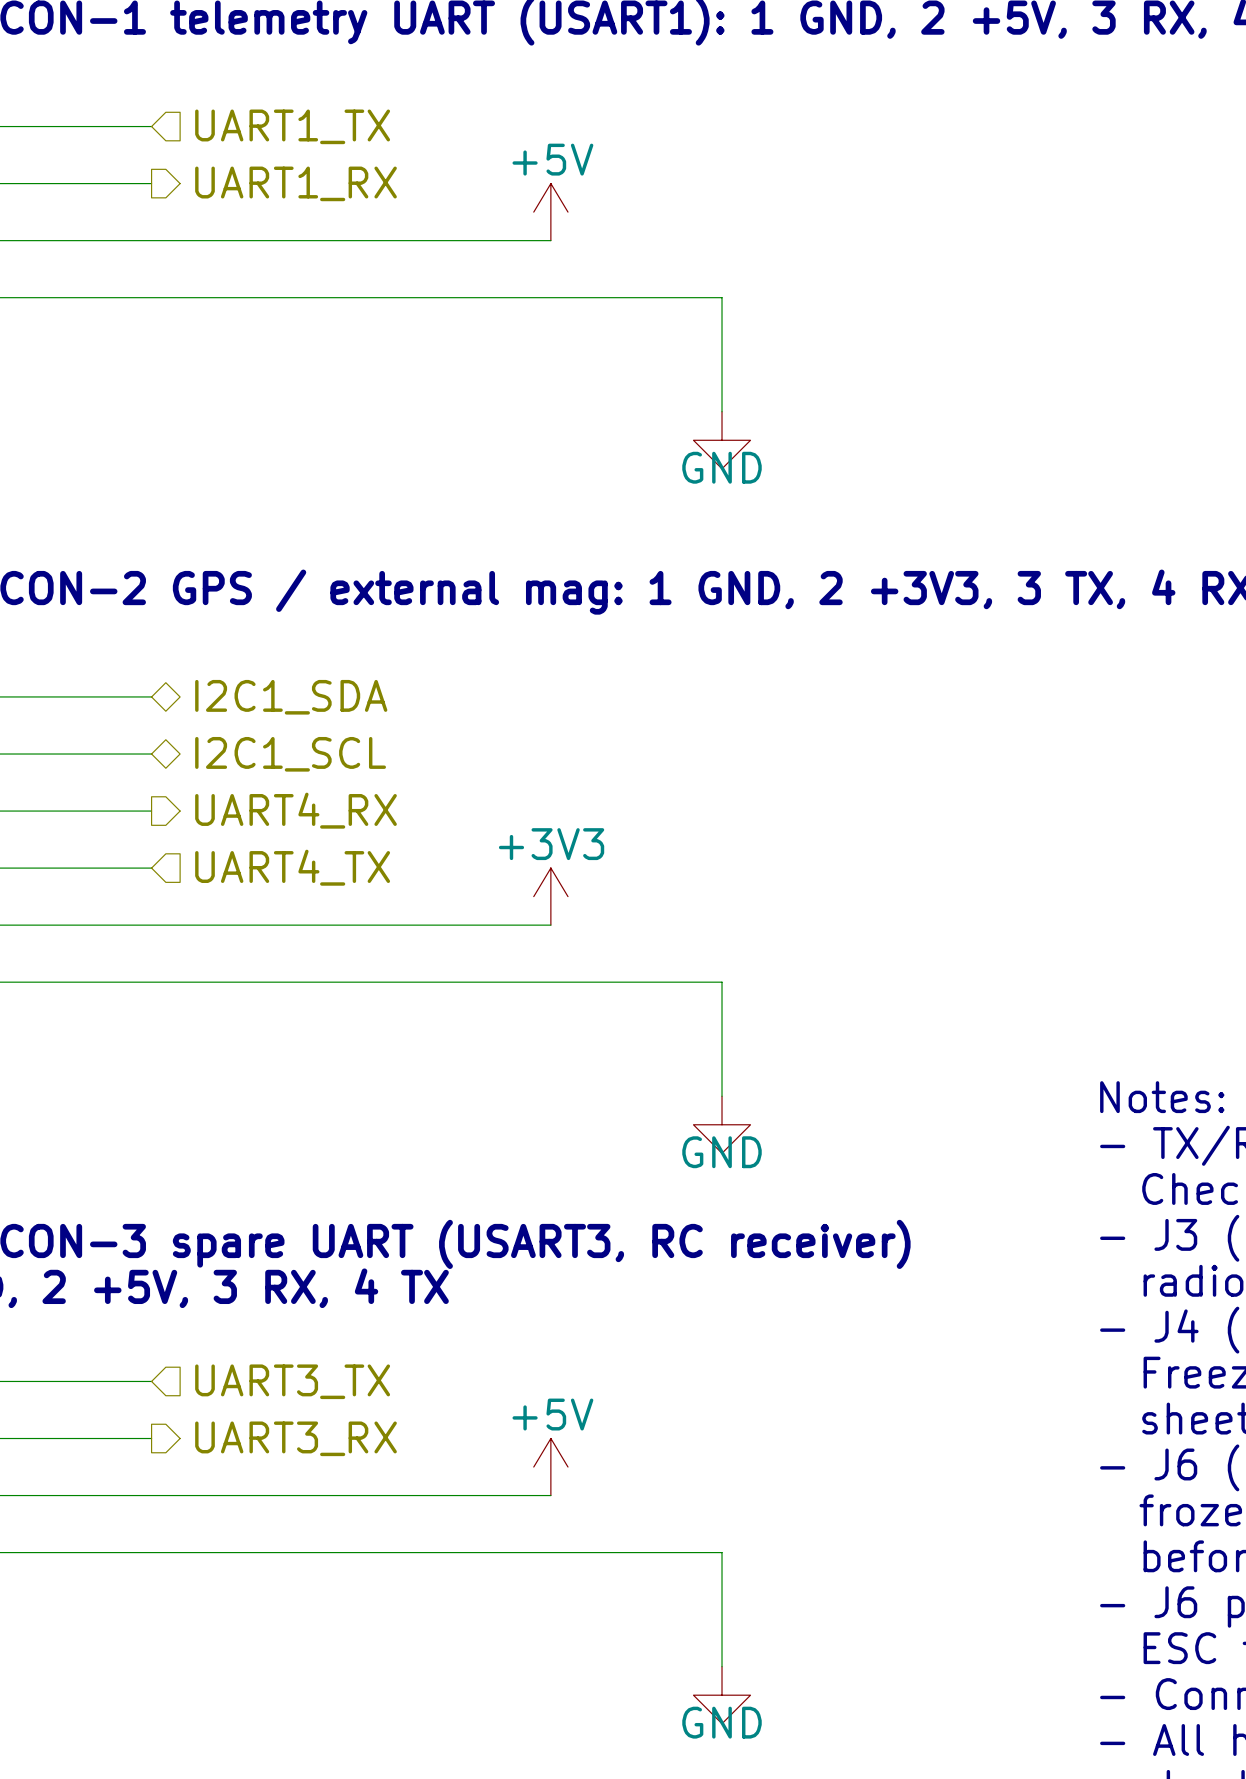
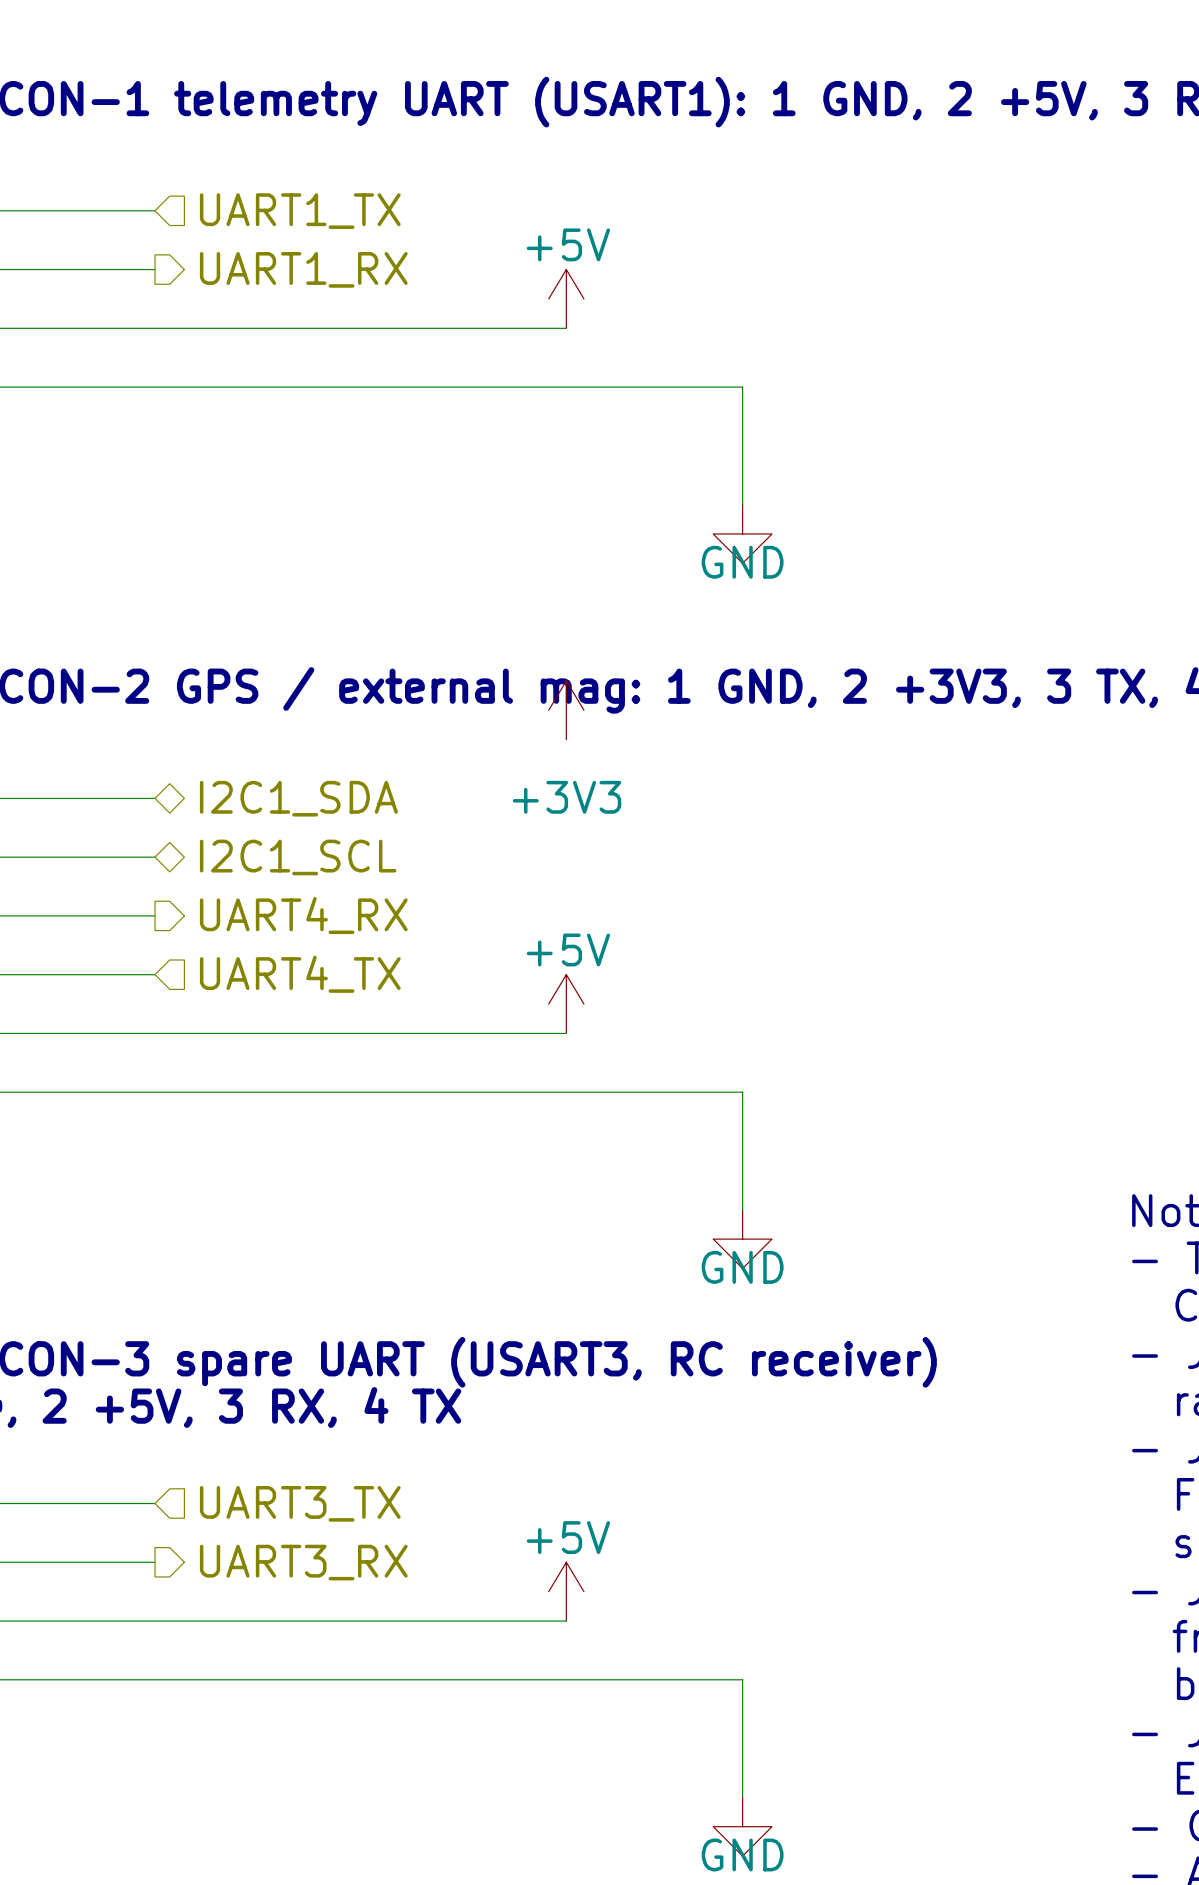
power symbol: none -> +3V3 (566, 710)
power symbol: +3V3 (550, 896) -> +5V (566, 1004)

